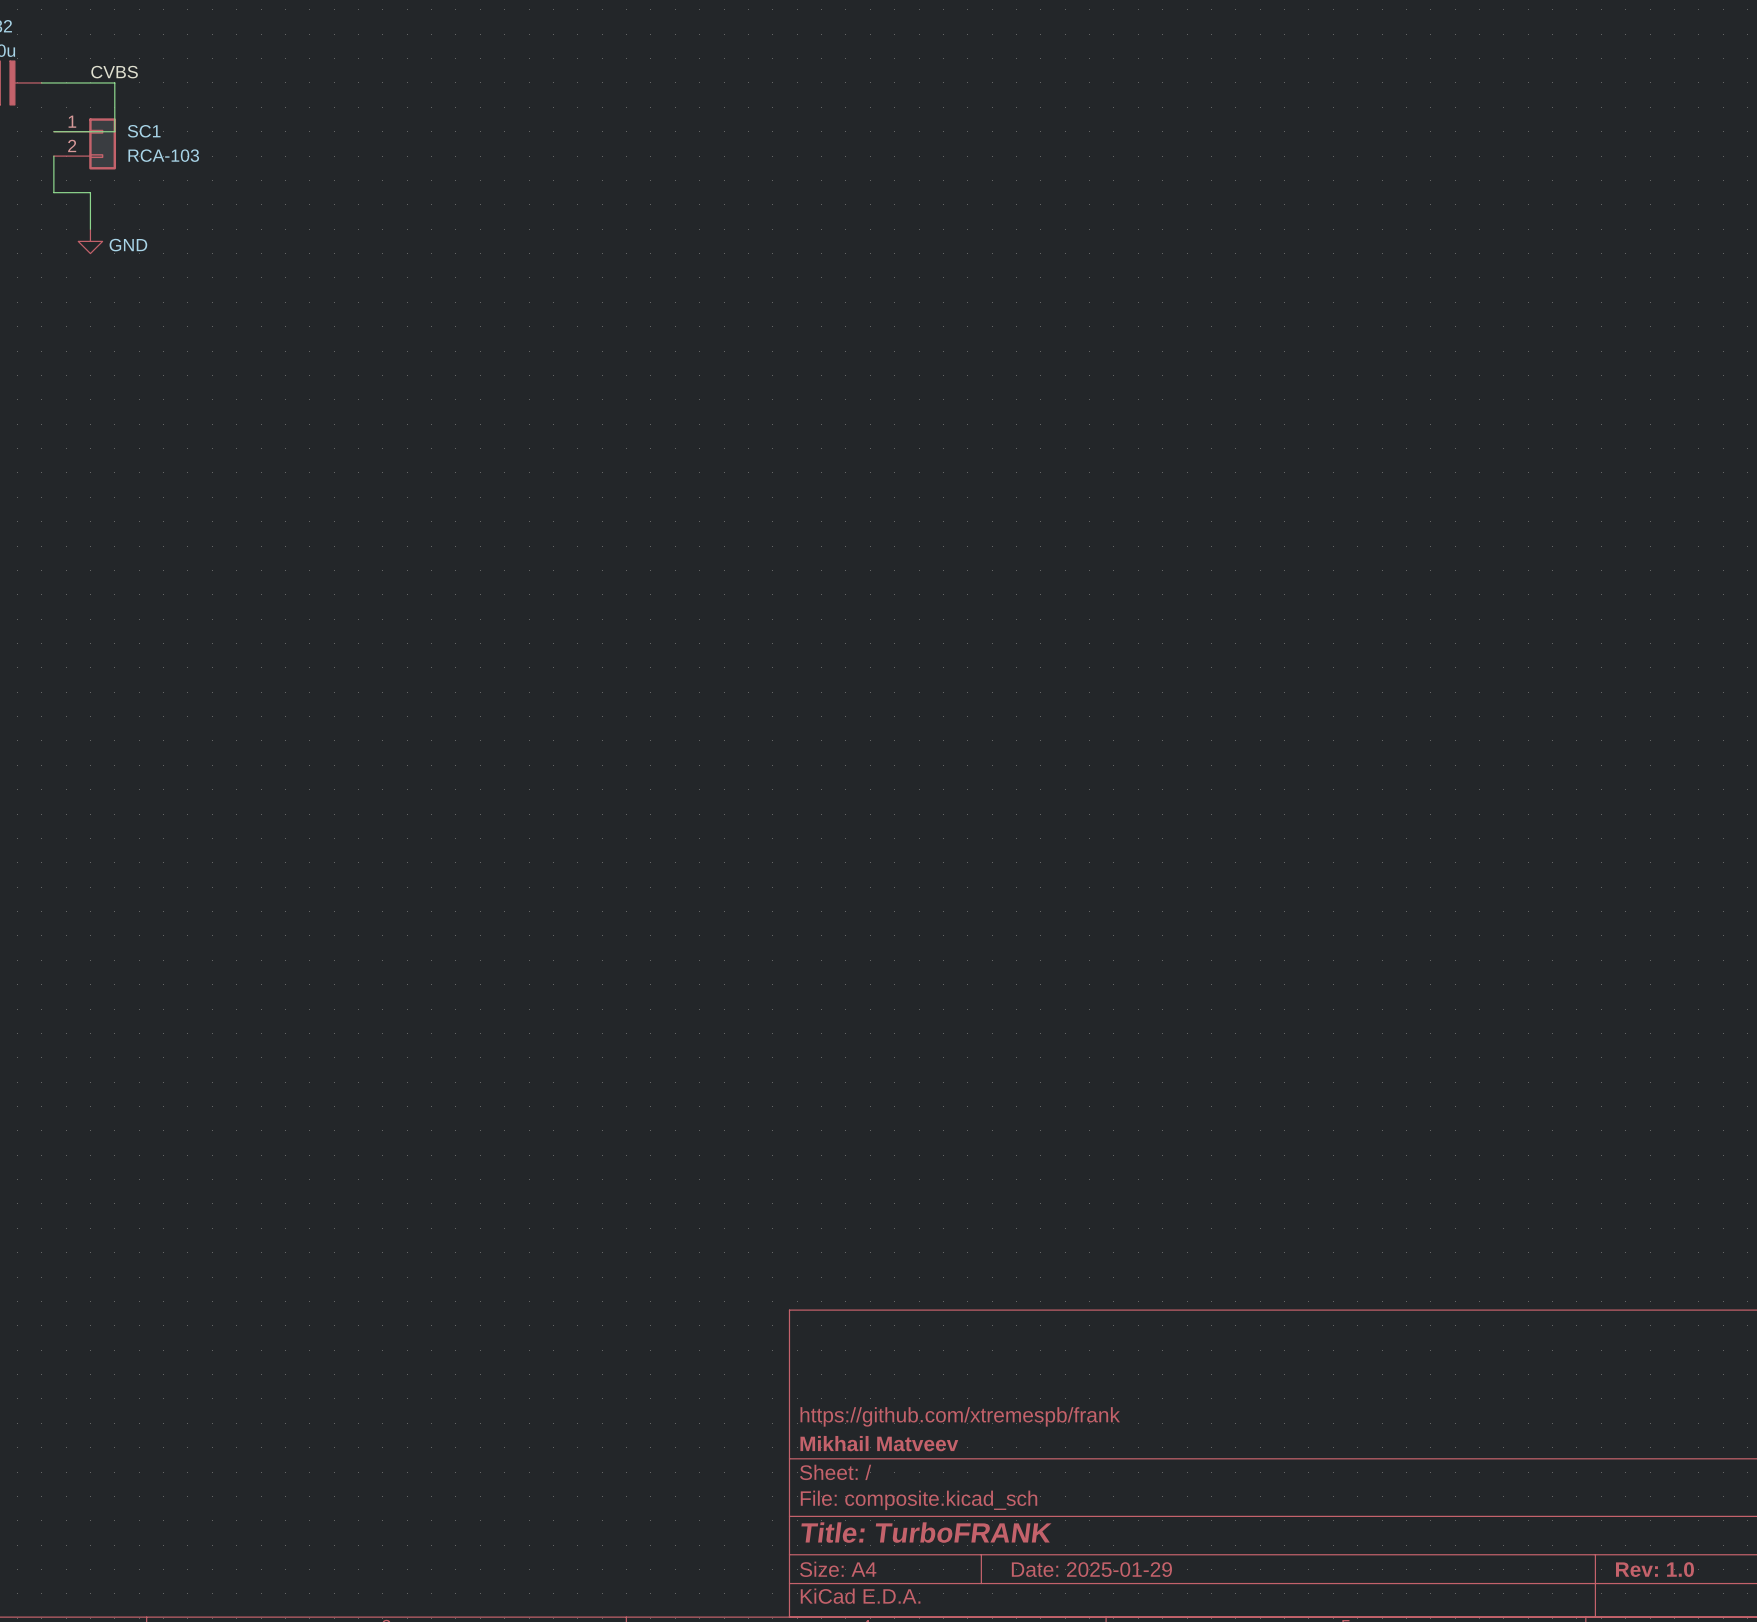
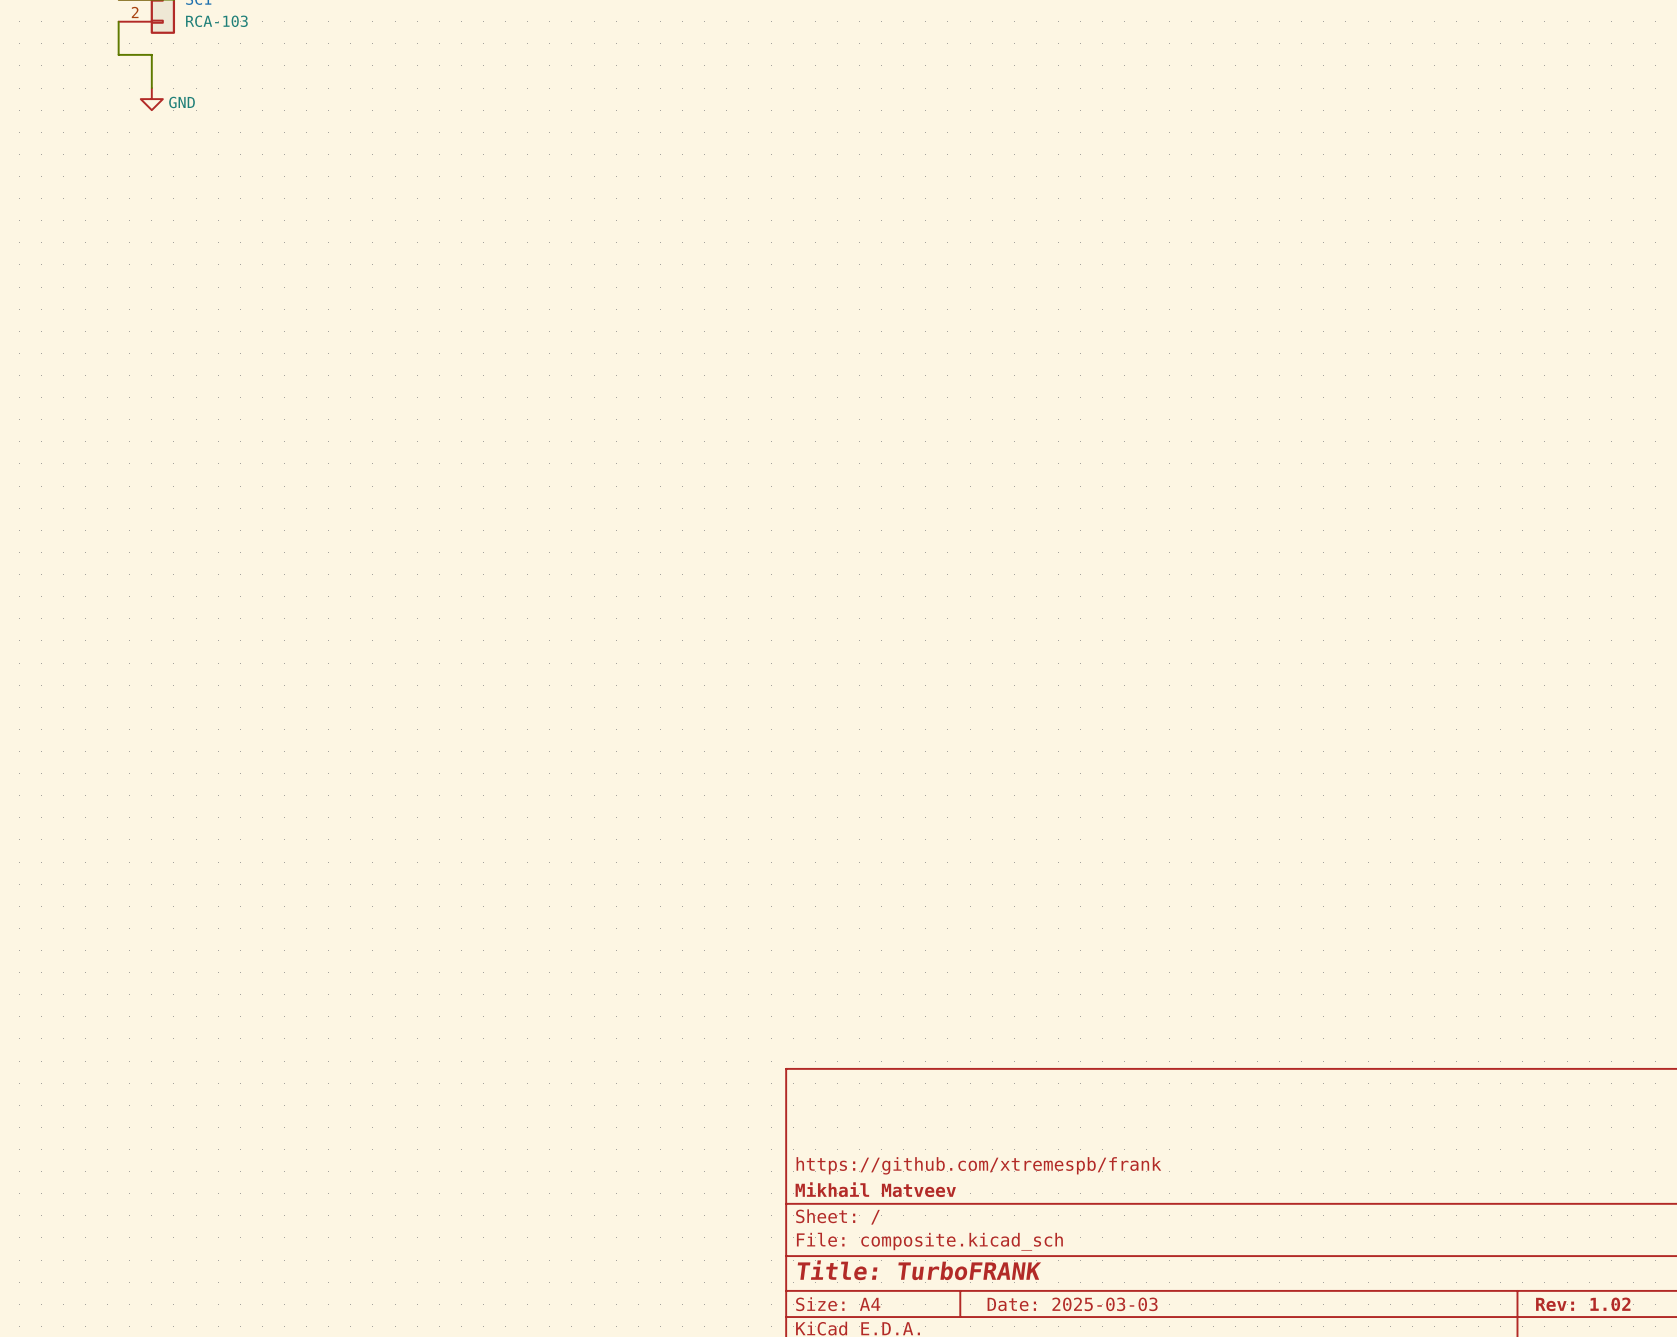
title block: Date: 2025-01-29 (1091, 1569) -> Date: 2025-03-03 (1072, 1304)
title block: Rev: 1.0 (1654, 1569) -> Rev: 1.02 (1583, 1304)

